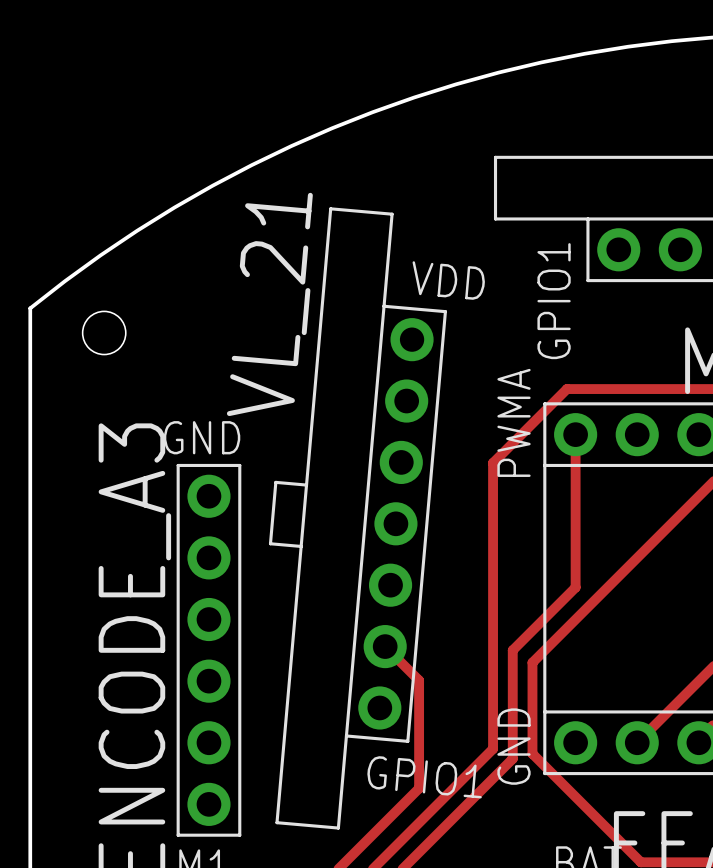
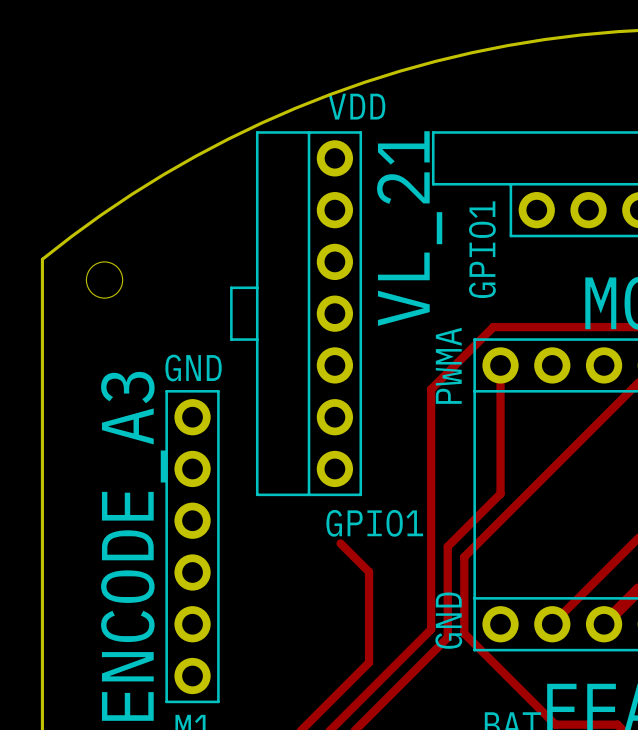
VL_21 footprint: [268, 207, 447, 830] -> [230, 131, 363, 497]
VL_21 name position: VL_21 (269, 304) -> VL_21 (409, 228)

